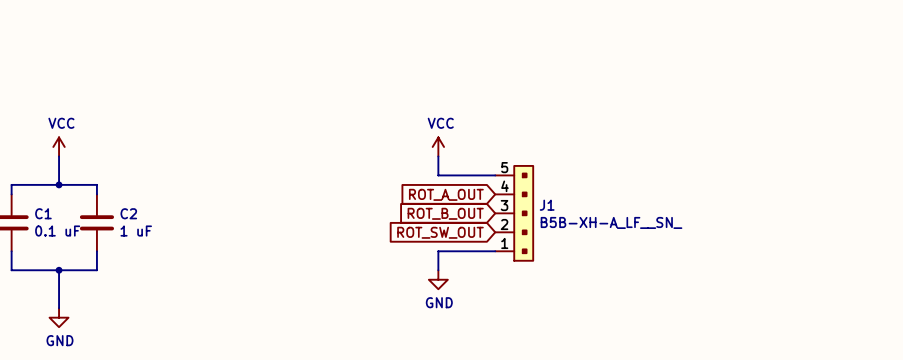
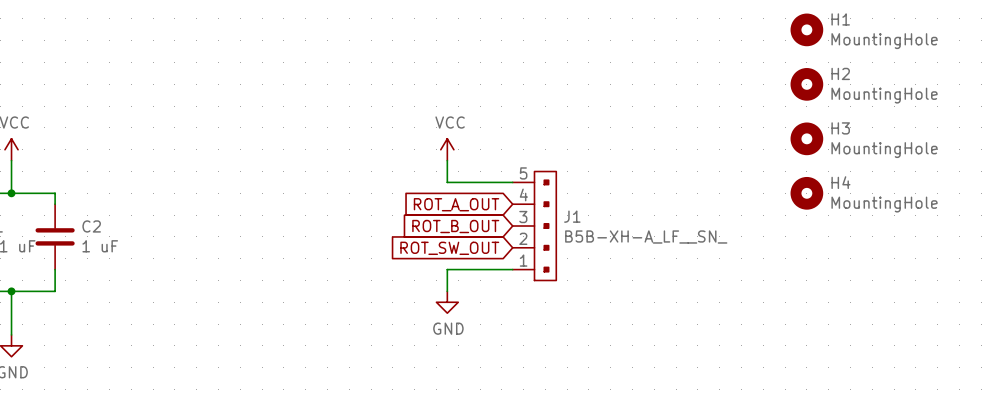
H1: none -> MountingHole (806, 29)
H2: none -> MountingHole (806, 84)
H3: none -> MountingHole (806, 138)
H4: none -> MountingHole (806, 193)

